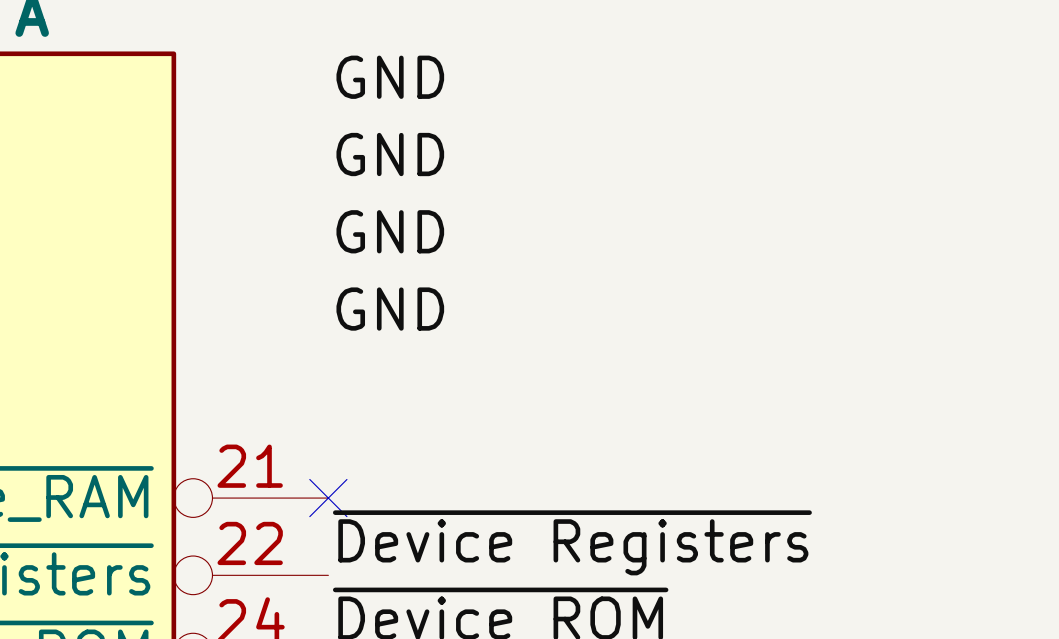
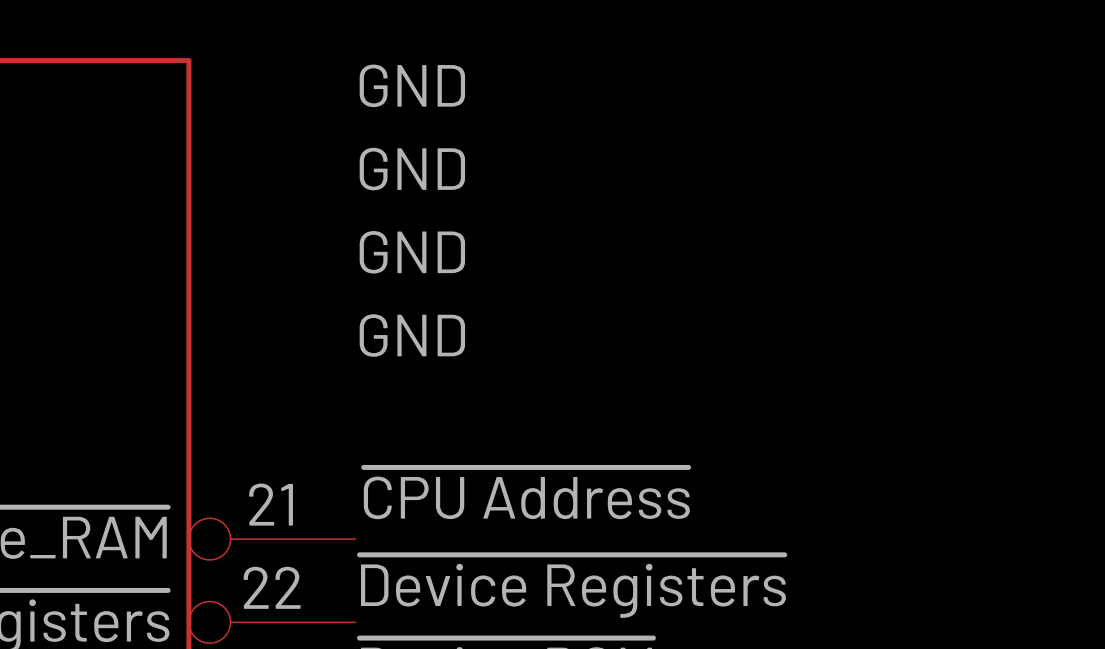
label: none -> ~{CPU Address} (526, 493)
no-connect mark: (328, 498) -> none

